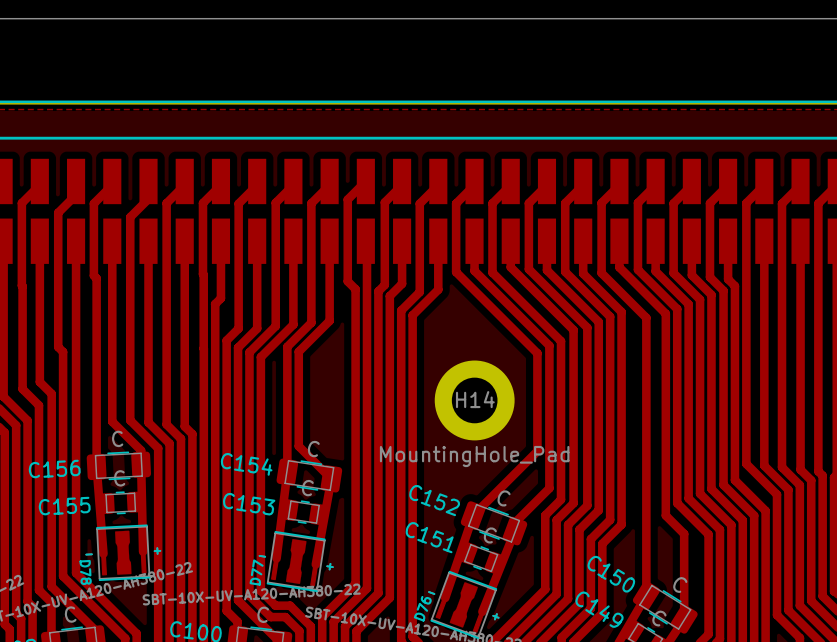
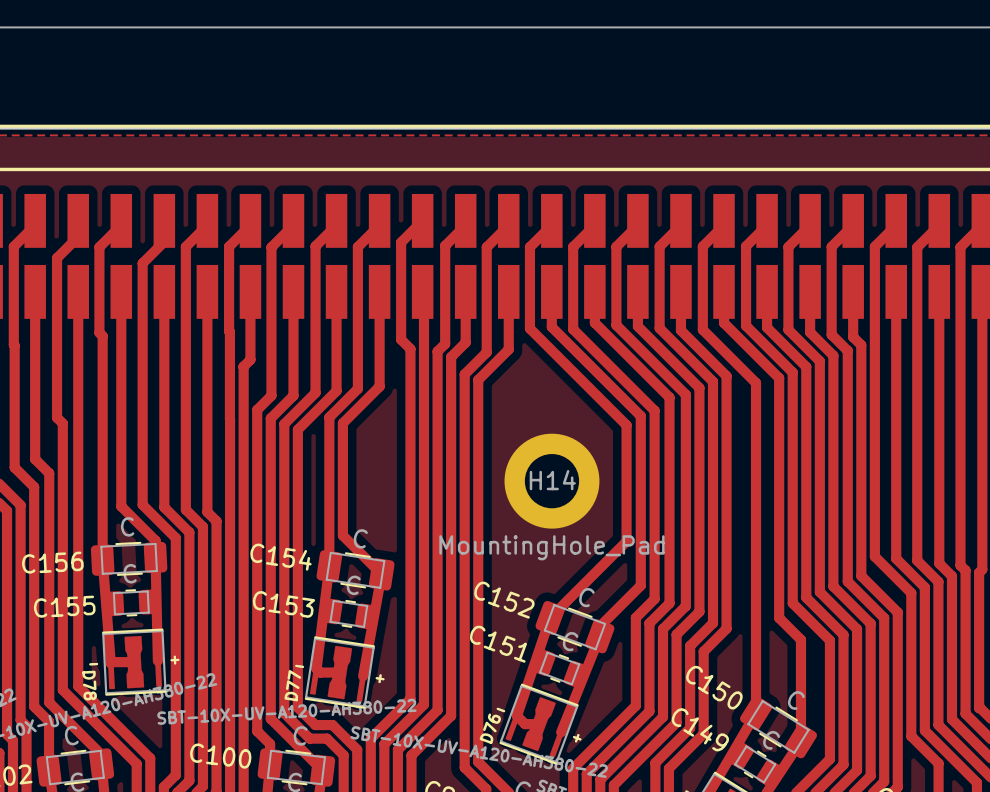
top track: none -> (134, 662) (110, 663)
top track: none -> (316, 668) (320, 672) (339, 672)
top track: none -> (516, 715) (525, 724) (539, 724)

